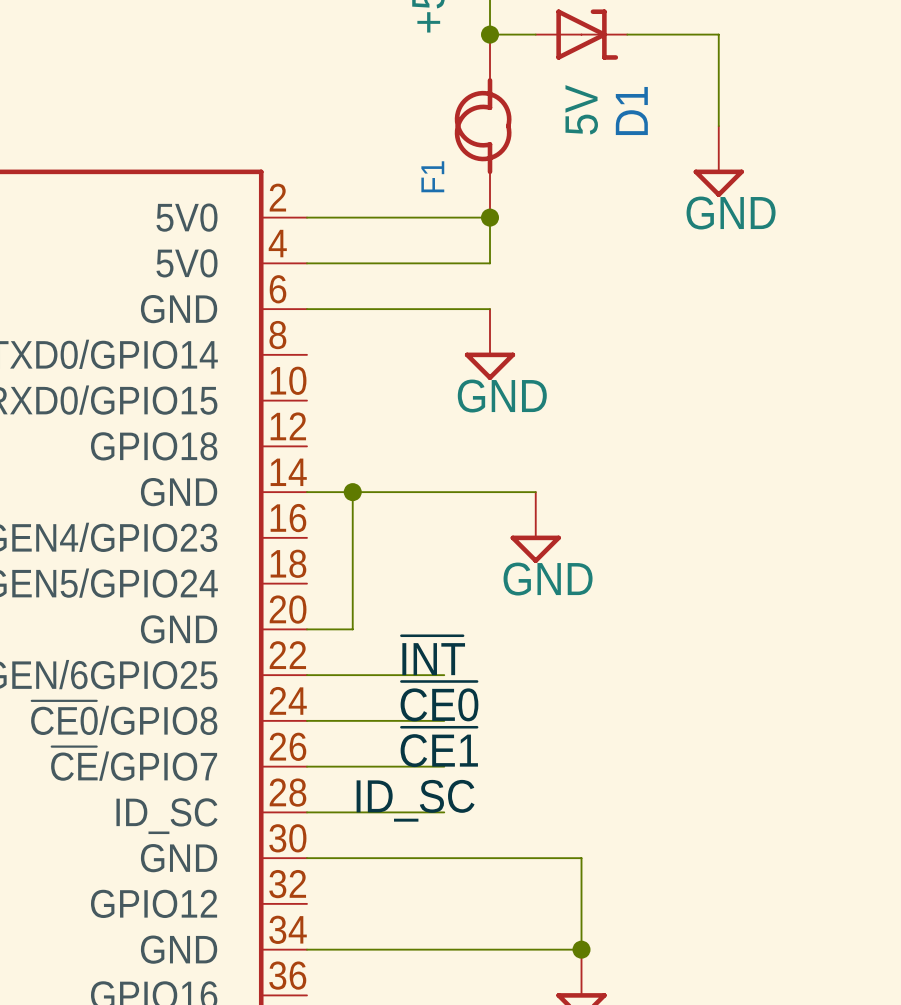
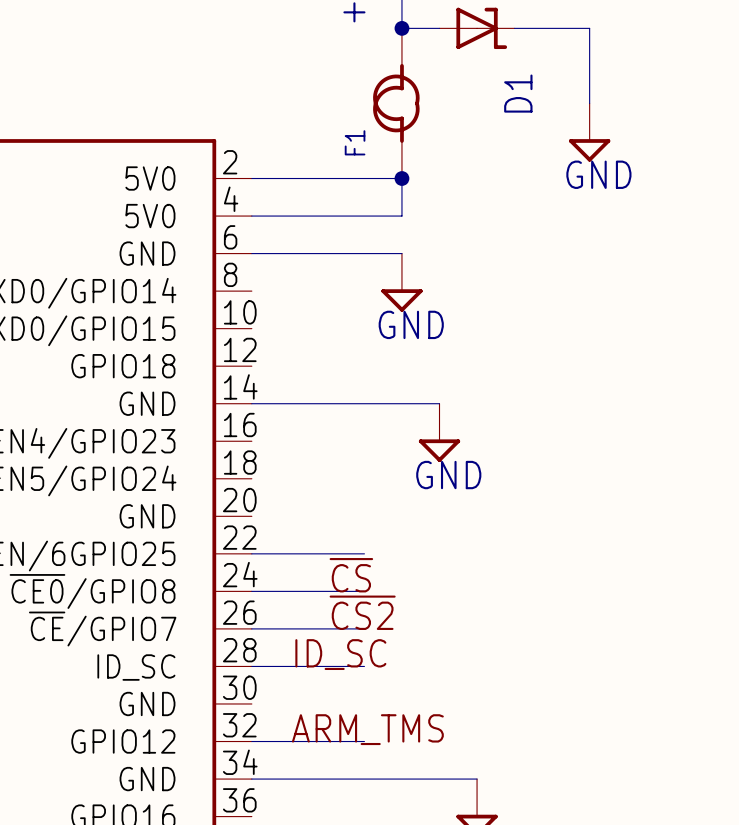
D1 value: 5V (581, 109) -> none
wire: (352, 492) (352, 629) (306, 629) -> none
junction: (352, 492) -> none
label: ~{INT} (433, 655) -> none
label: ~{CE0} (439, 701) -> ~{CS} (351, 575)
label: ~{CE1} (439, 747) -> ~{CS2} (362, 612)
wire: (306, 858) (581, 858) (581, 949) -> none
label: none -> ARM_TMS (367, 729)
wire: none -> (251, 741) (364, 741)
junction: (581, 949) -> none

